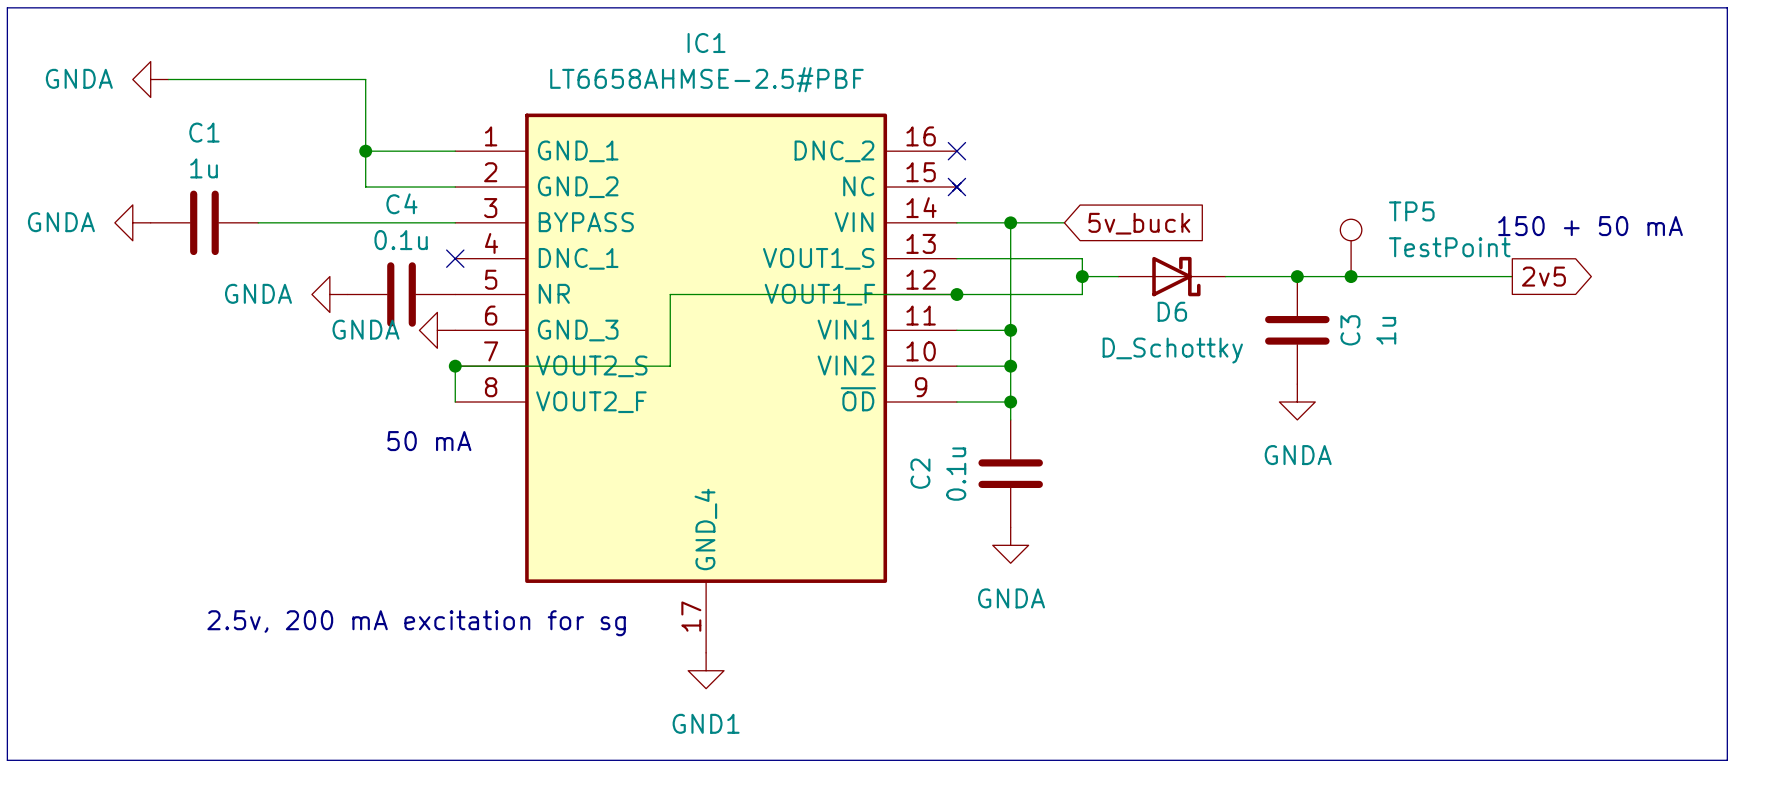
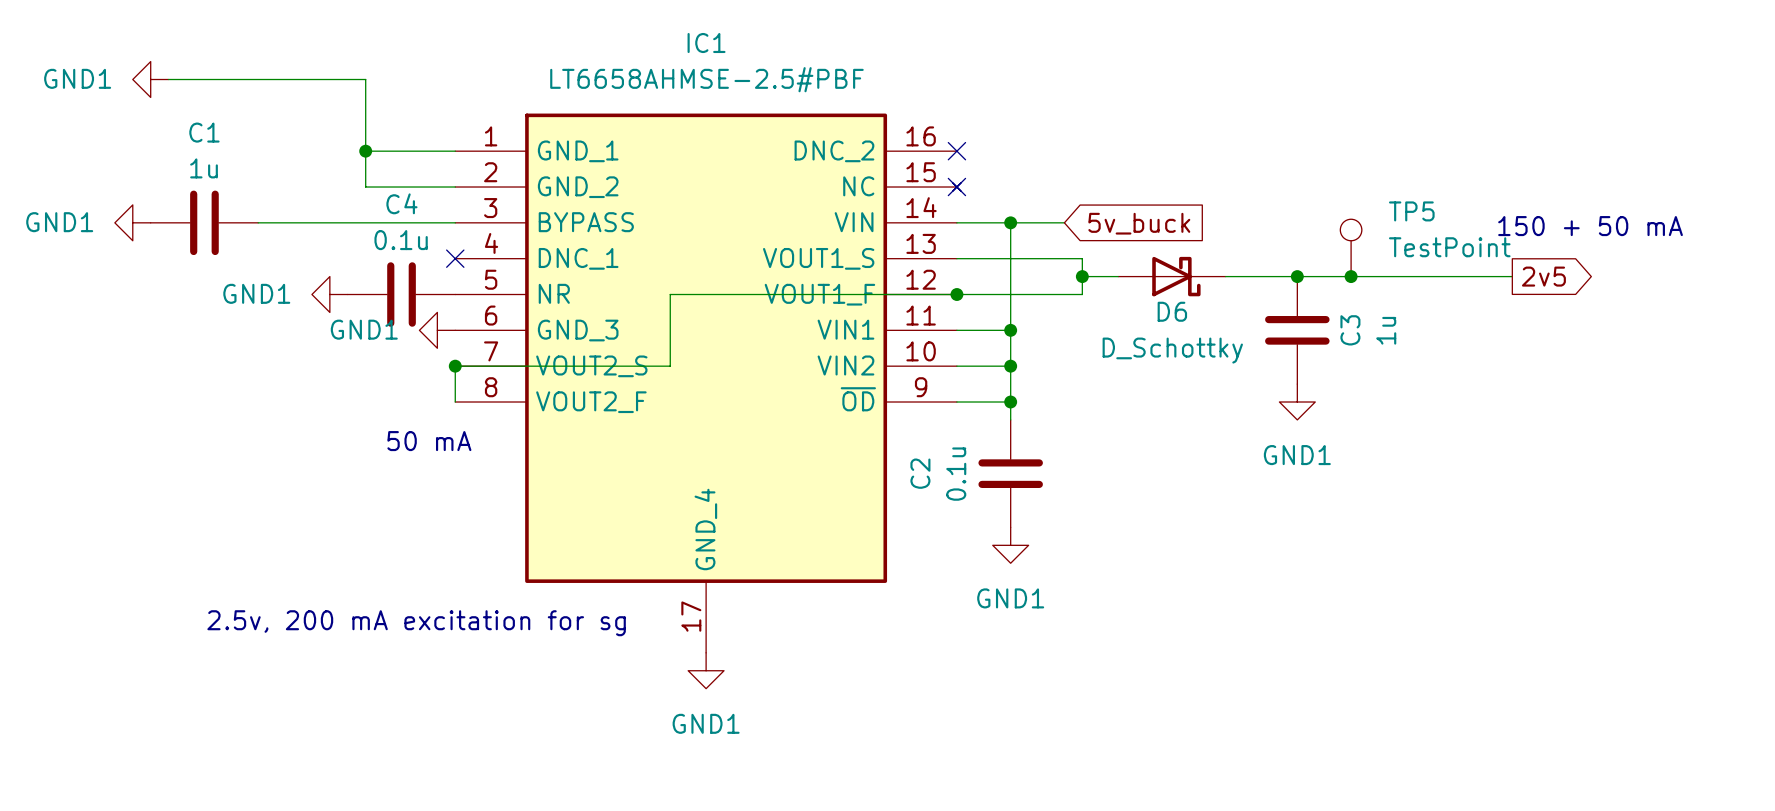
line: (7, 7) (1727, 7) (1727, 760) (7, 760) (7, 7) -> none
power symbol: GNDA (150, 79) -> GND1 (150, 79)
power symbol: GNDA (132, 222) -> GND1 (132, 222)
power symbol: GNDA (329, 294) -> GND1 (329, 294)
power symbol: GNDA (437, 330) -> GND1 (437, 330)
power symbol: GNDA (1297, 402) -> GND1 (1297, 402)
power symbol: GNDA (1010, 545) -> GND1 (1010, 545)

